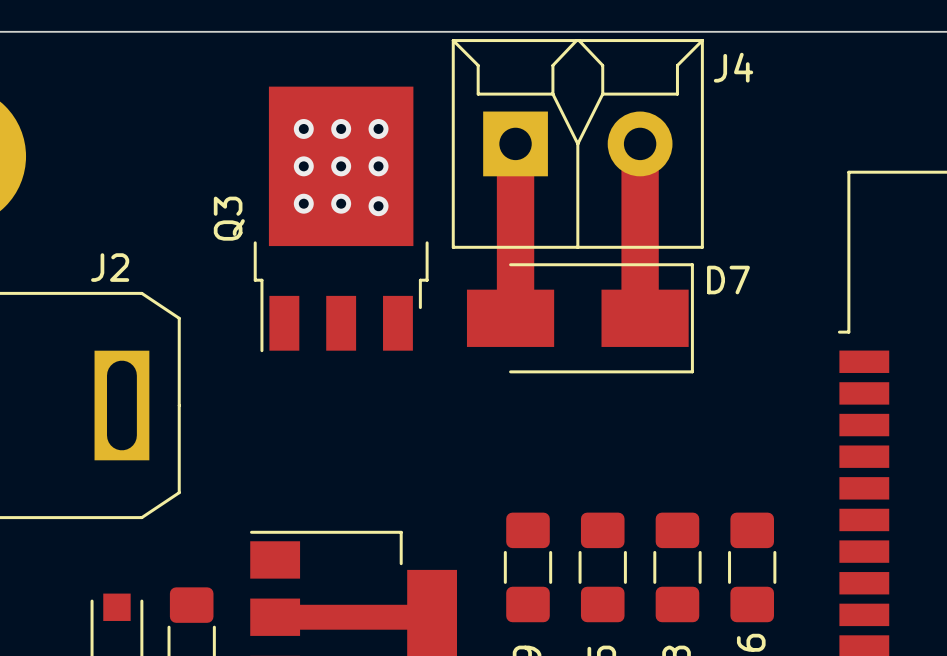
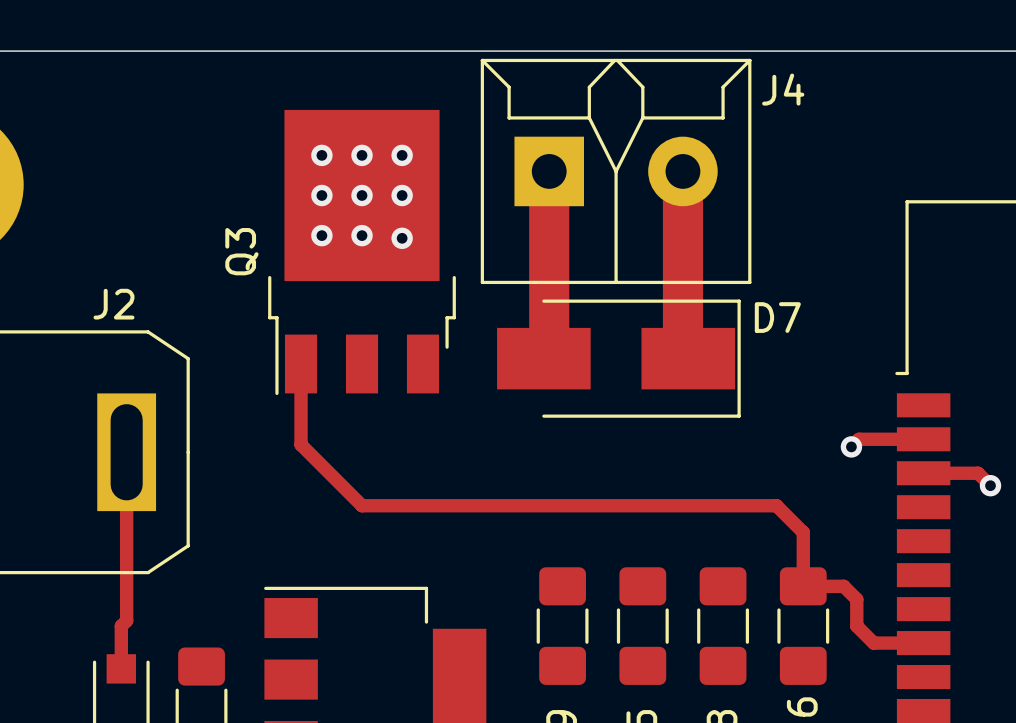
track: none -> (301, 364) (301, 444) (362, 505) (776, 505) (803, 532) (803, 586) (843, 586) (856, 599) (856, 626) (873, 643) (923, 643)
track: none -> (923, 439) (859, 439) (851, 446)
via: none -> (851, 446)
track: none -> (126, 452) (126, 620) (121, 626) (121, 668)
track: none -> (923, 473) (978, 473) (990, 485)
via: none -> (990, 485)
track: (275, 617) (432, 617) -> none

